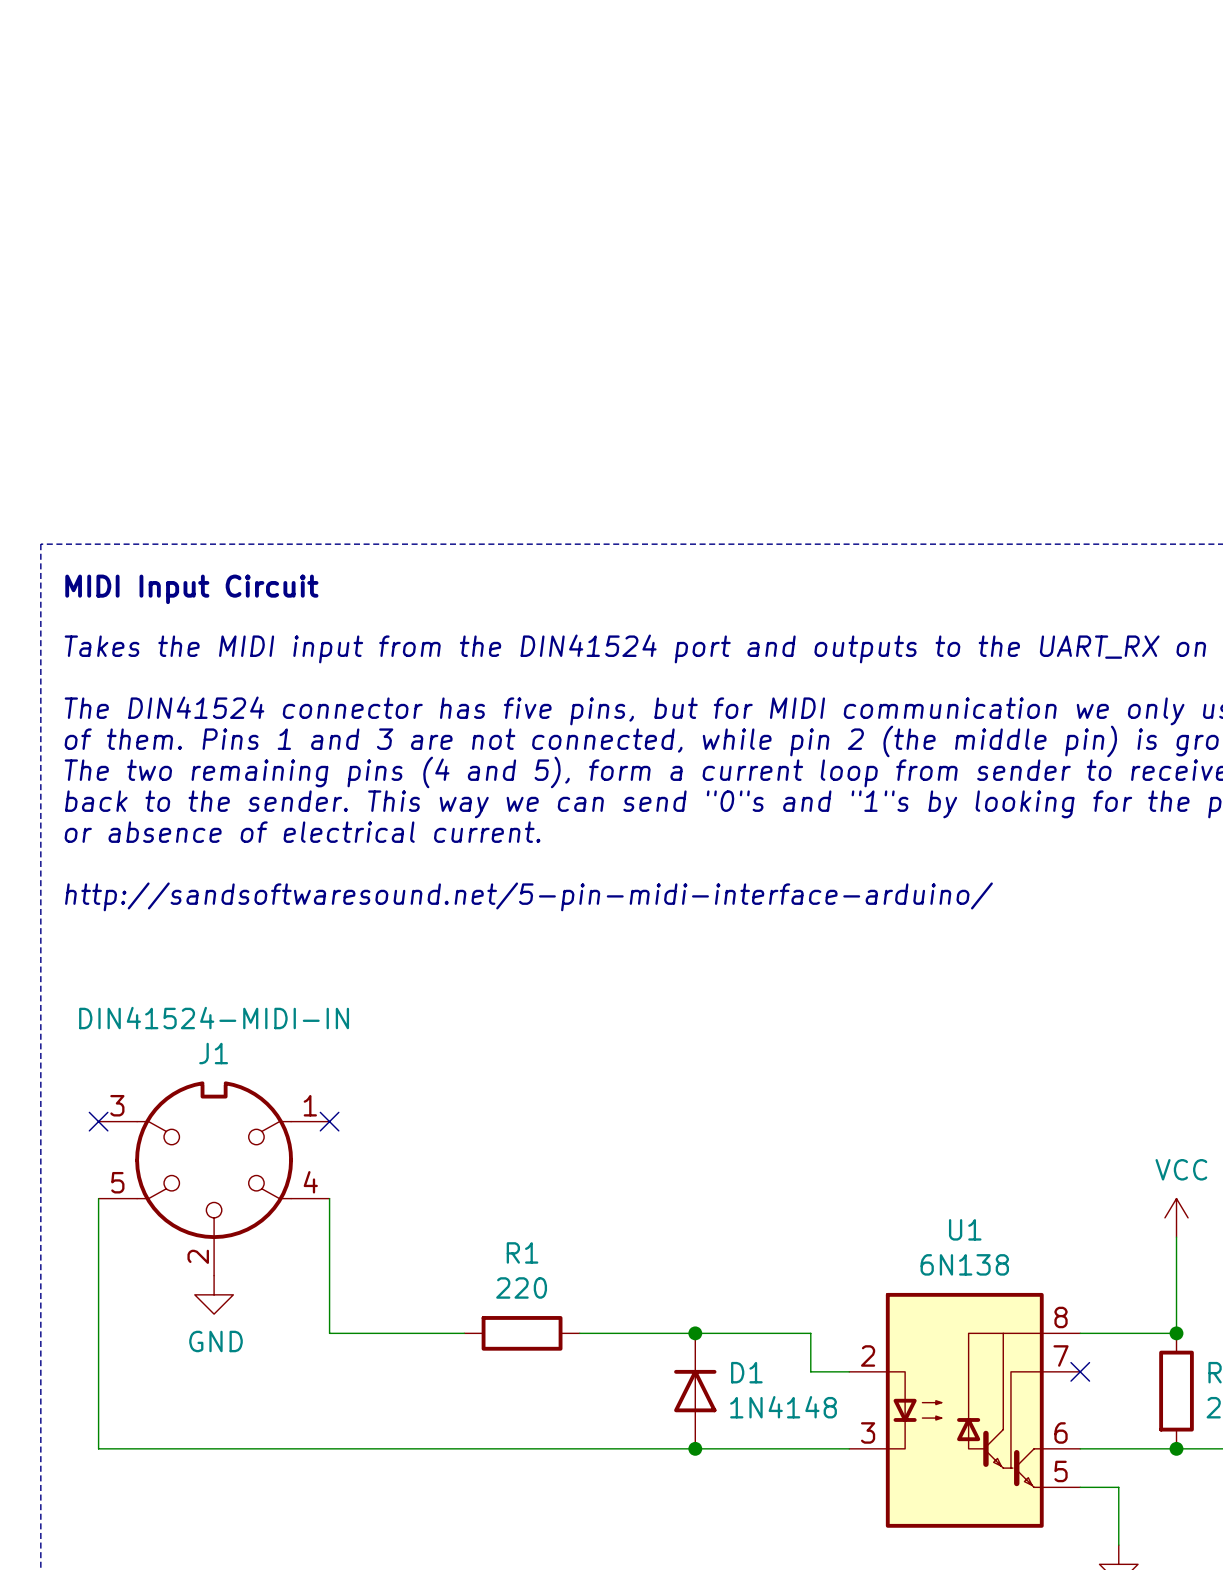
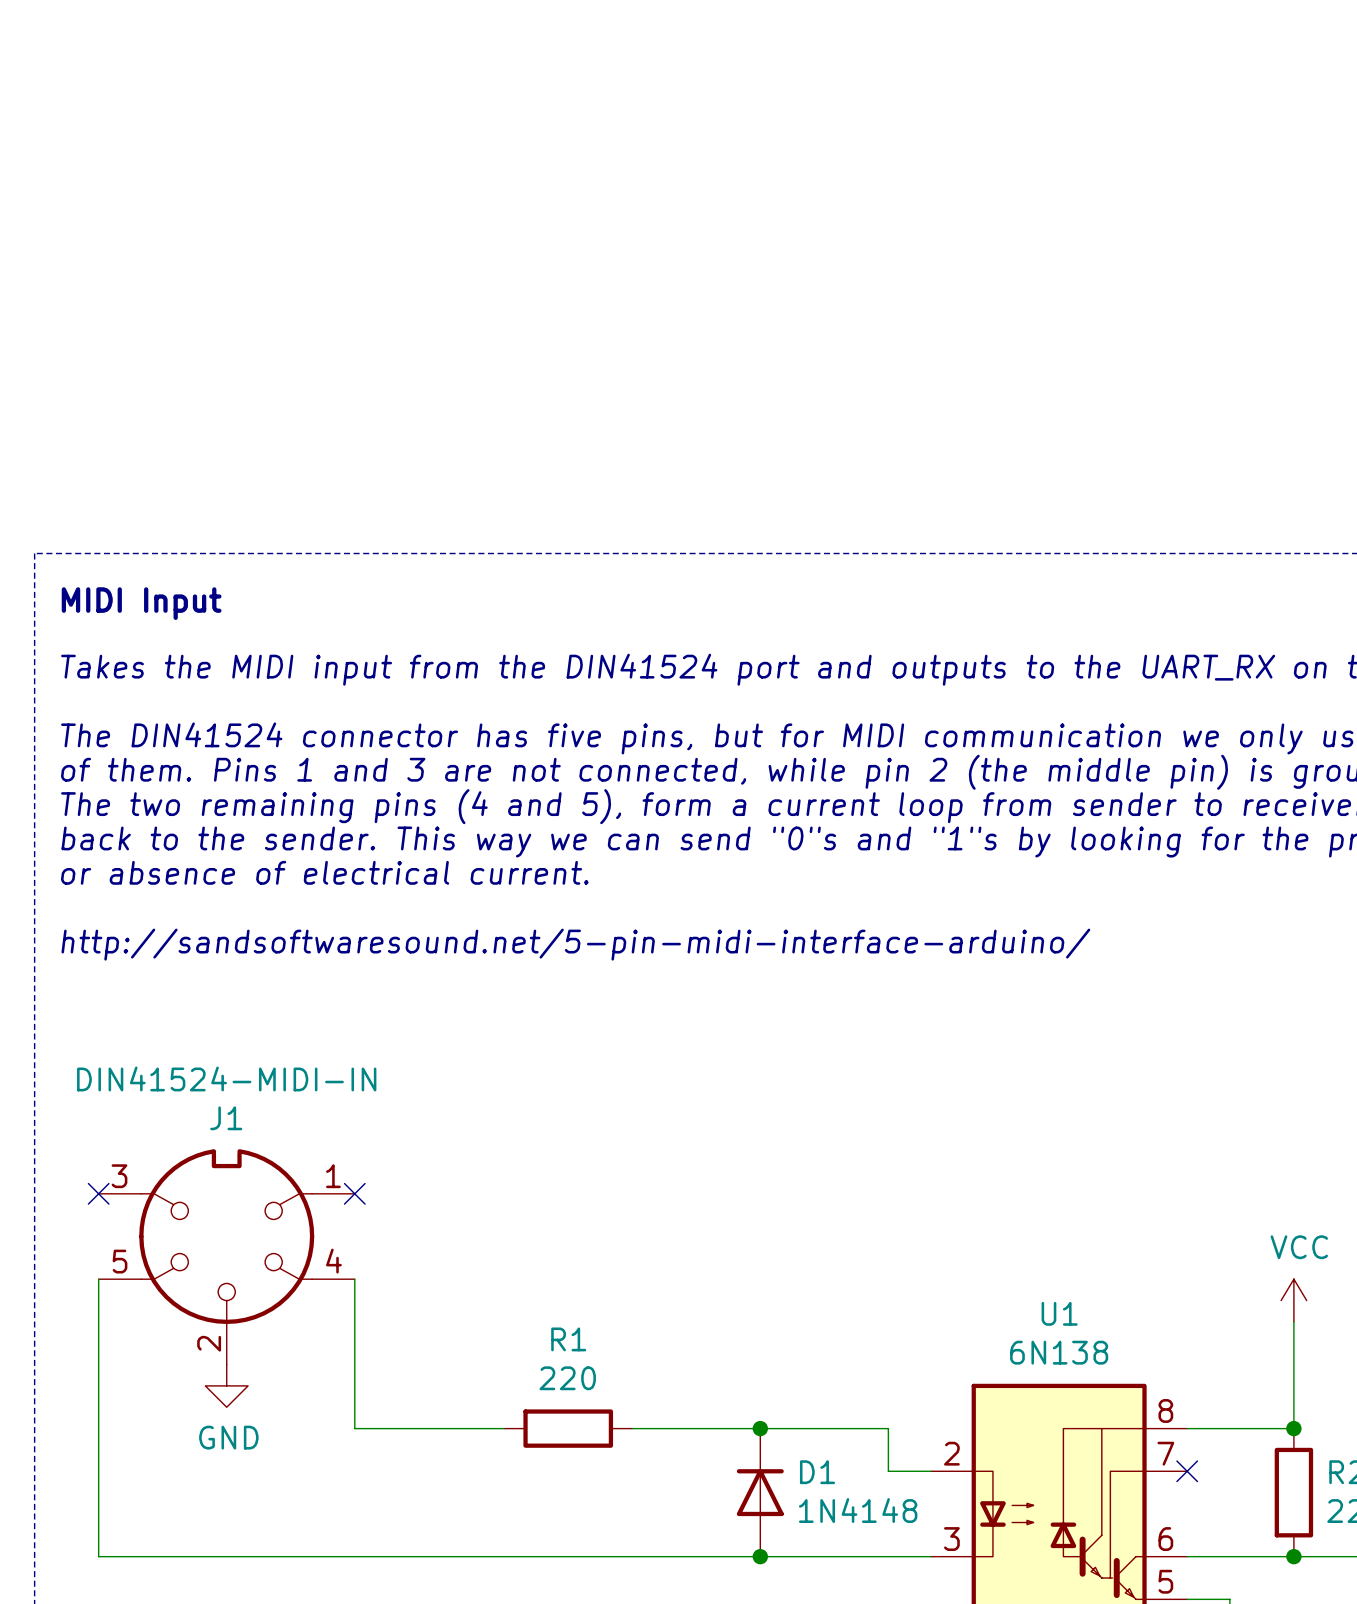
text: MIDI Input Circuit (191, 589) -> MIDI Input (141, 603)

